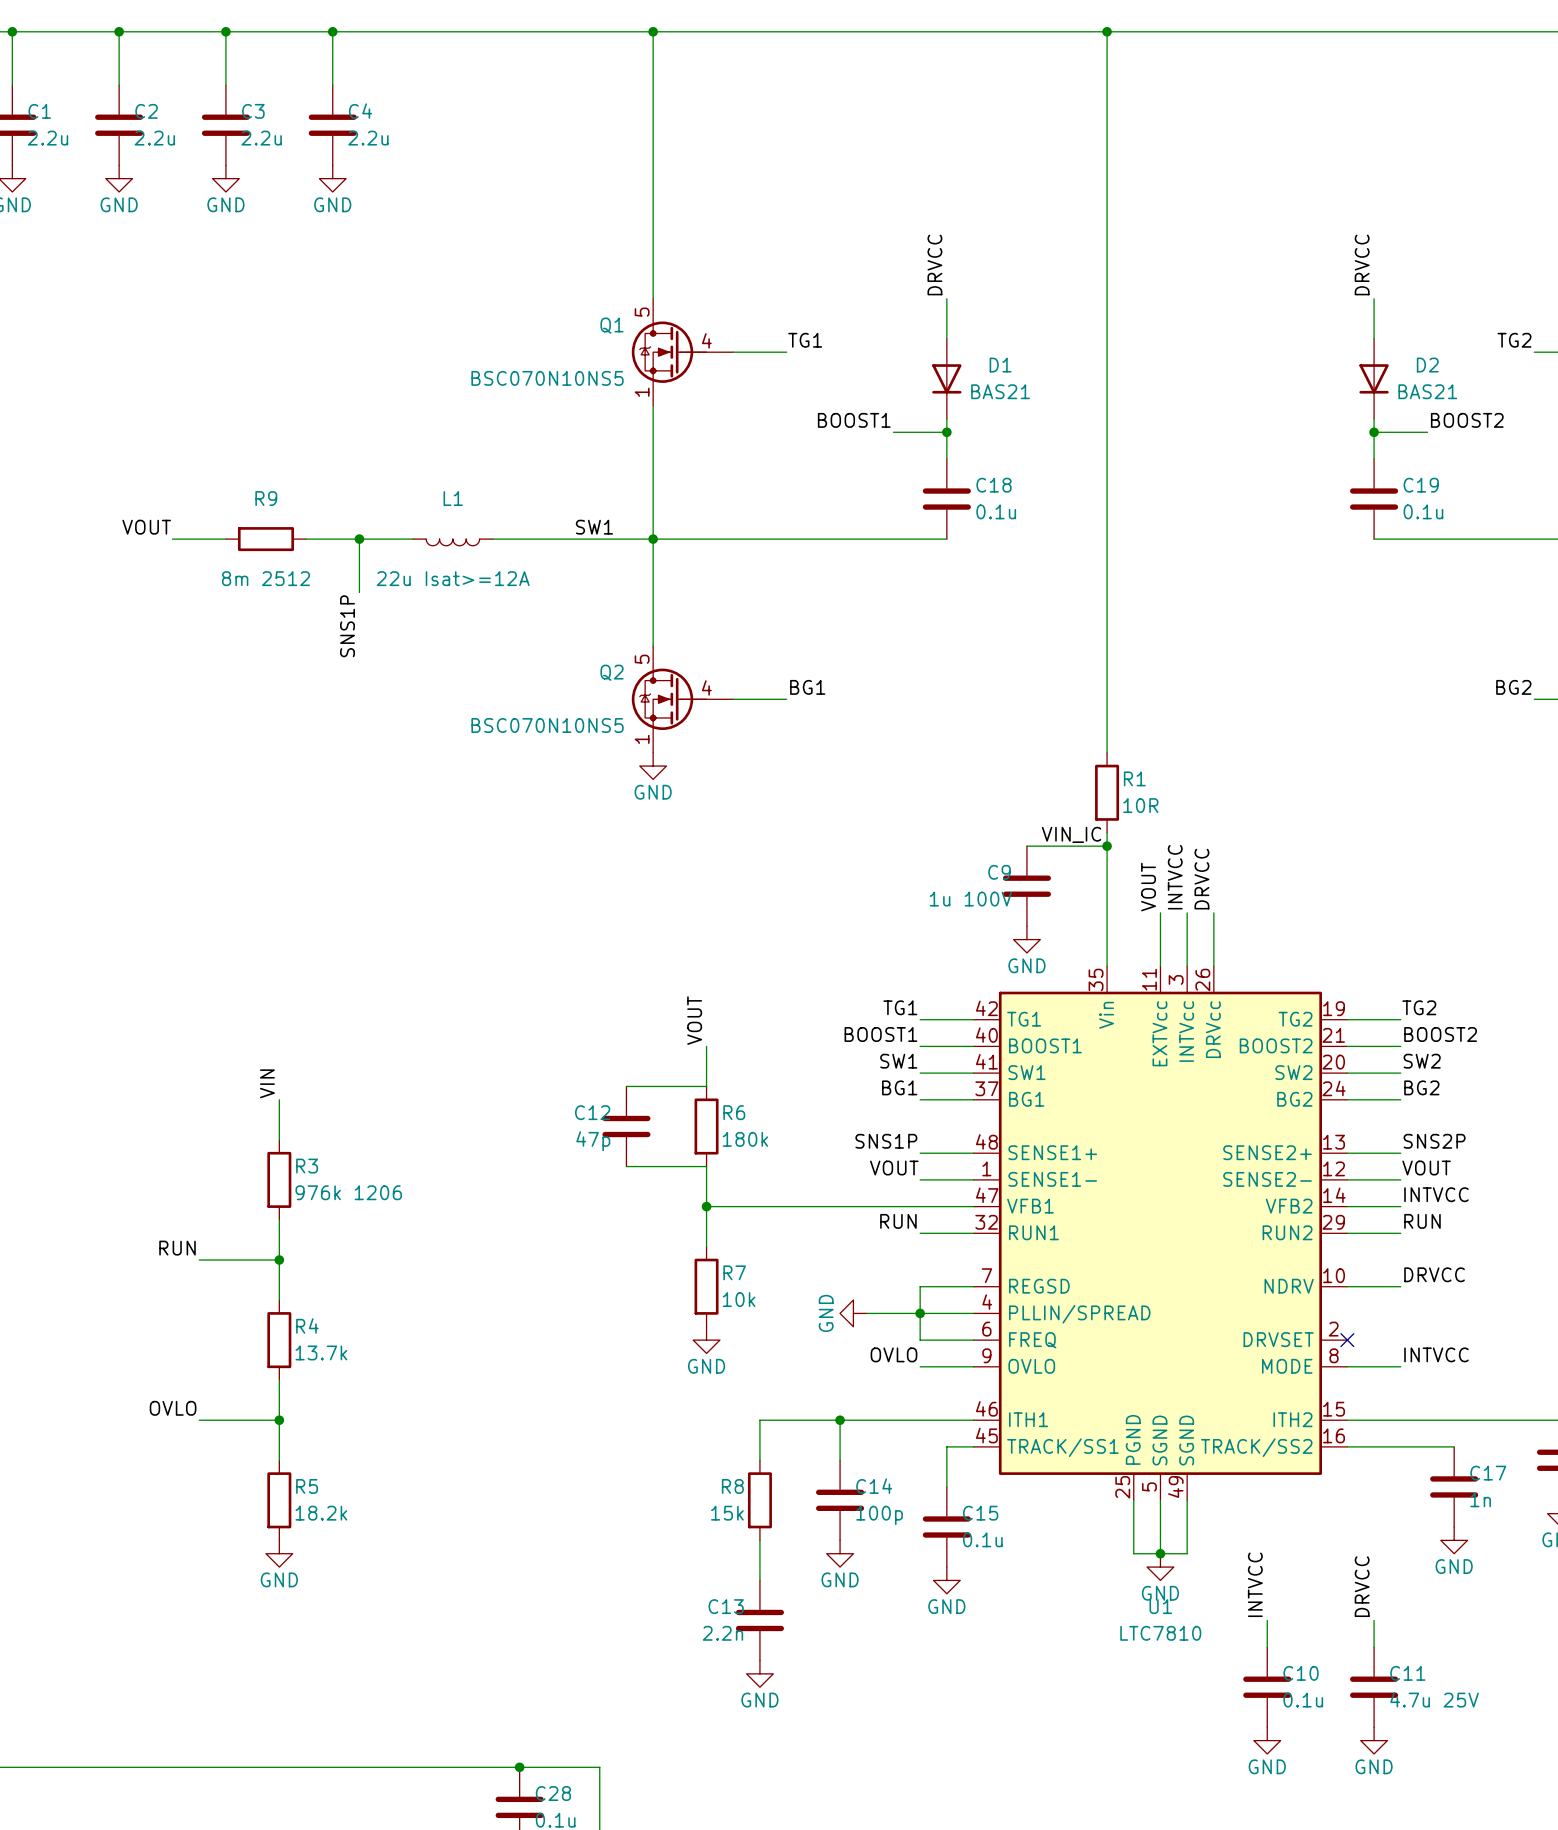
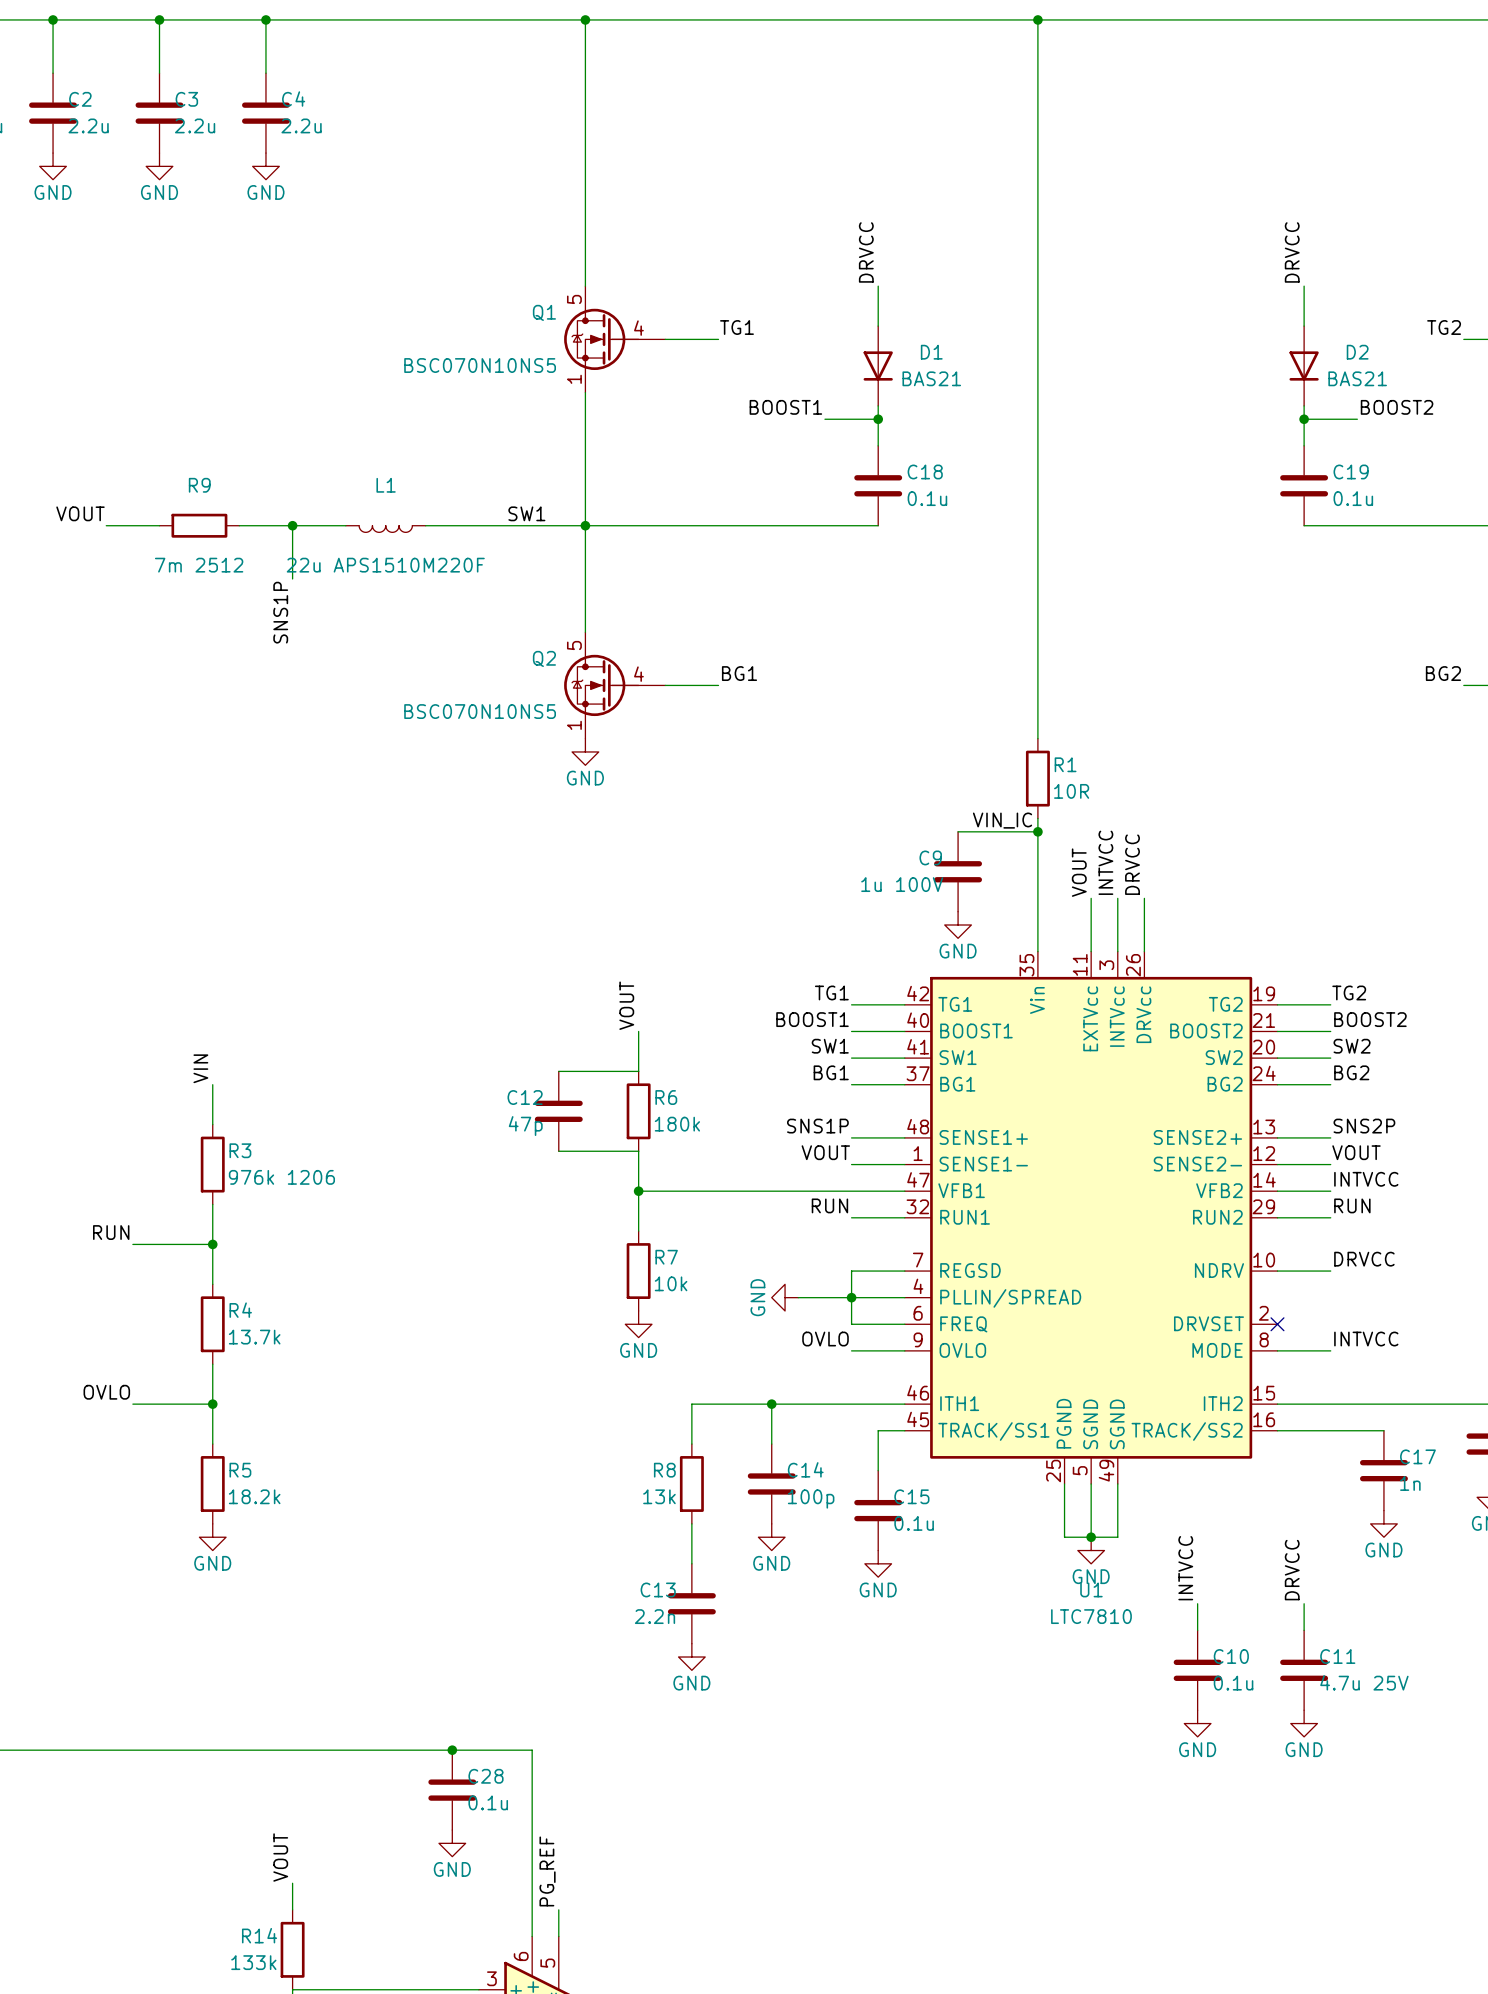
R9 value: 8m 2512 (265, 578) -> 7m 2512 (199, 565)
L1 value: 22u Isat>=12A (453, 578) -> 22u APS1510M220F (385, 565)
R8 value: 15k (727, 1513) -> 13k (659, 1496)

